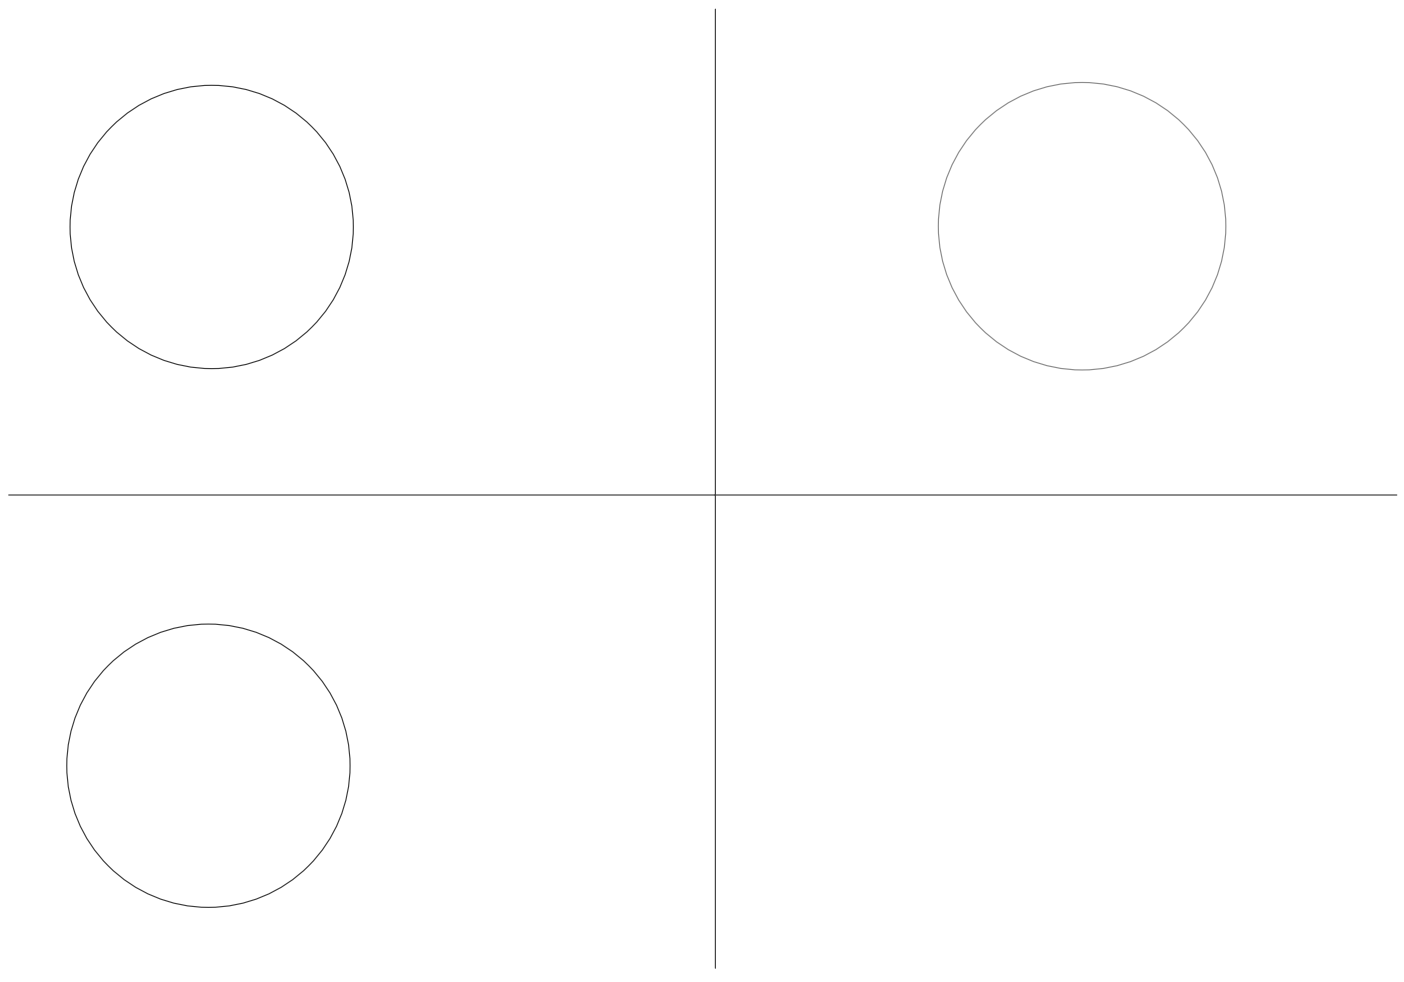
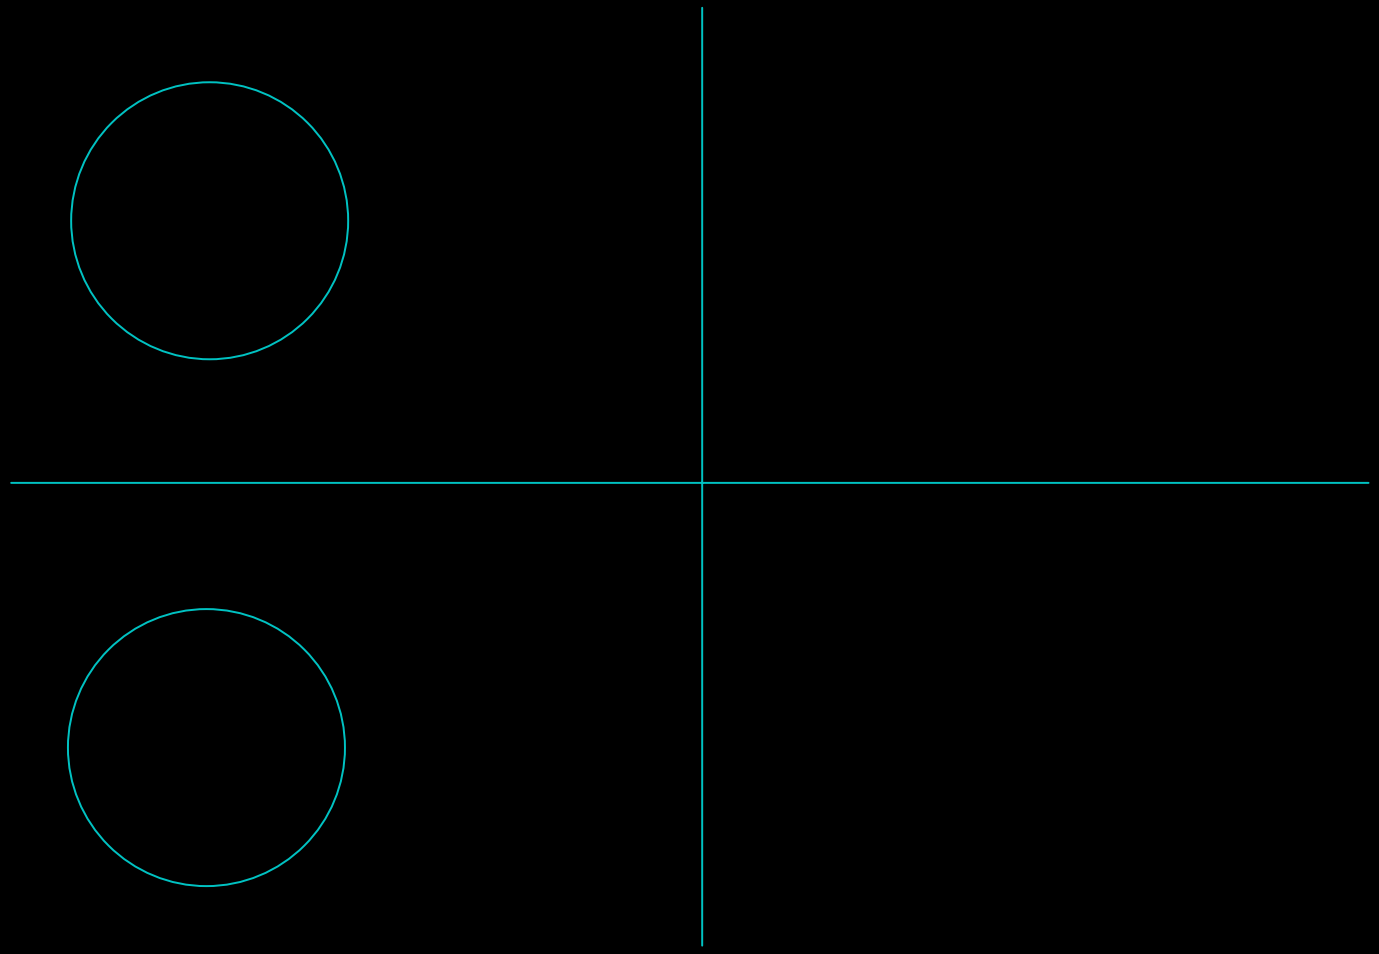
drawing: [937, 82, 1227, 371] -> none

